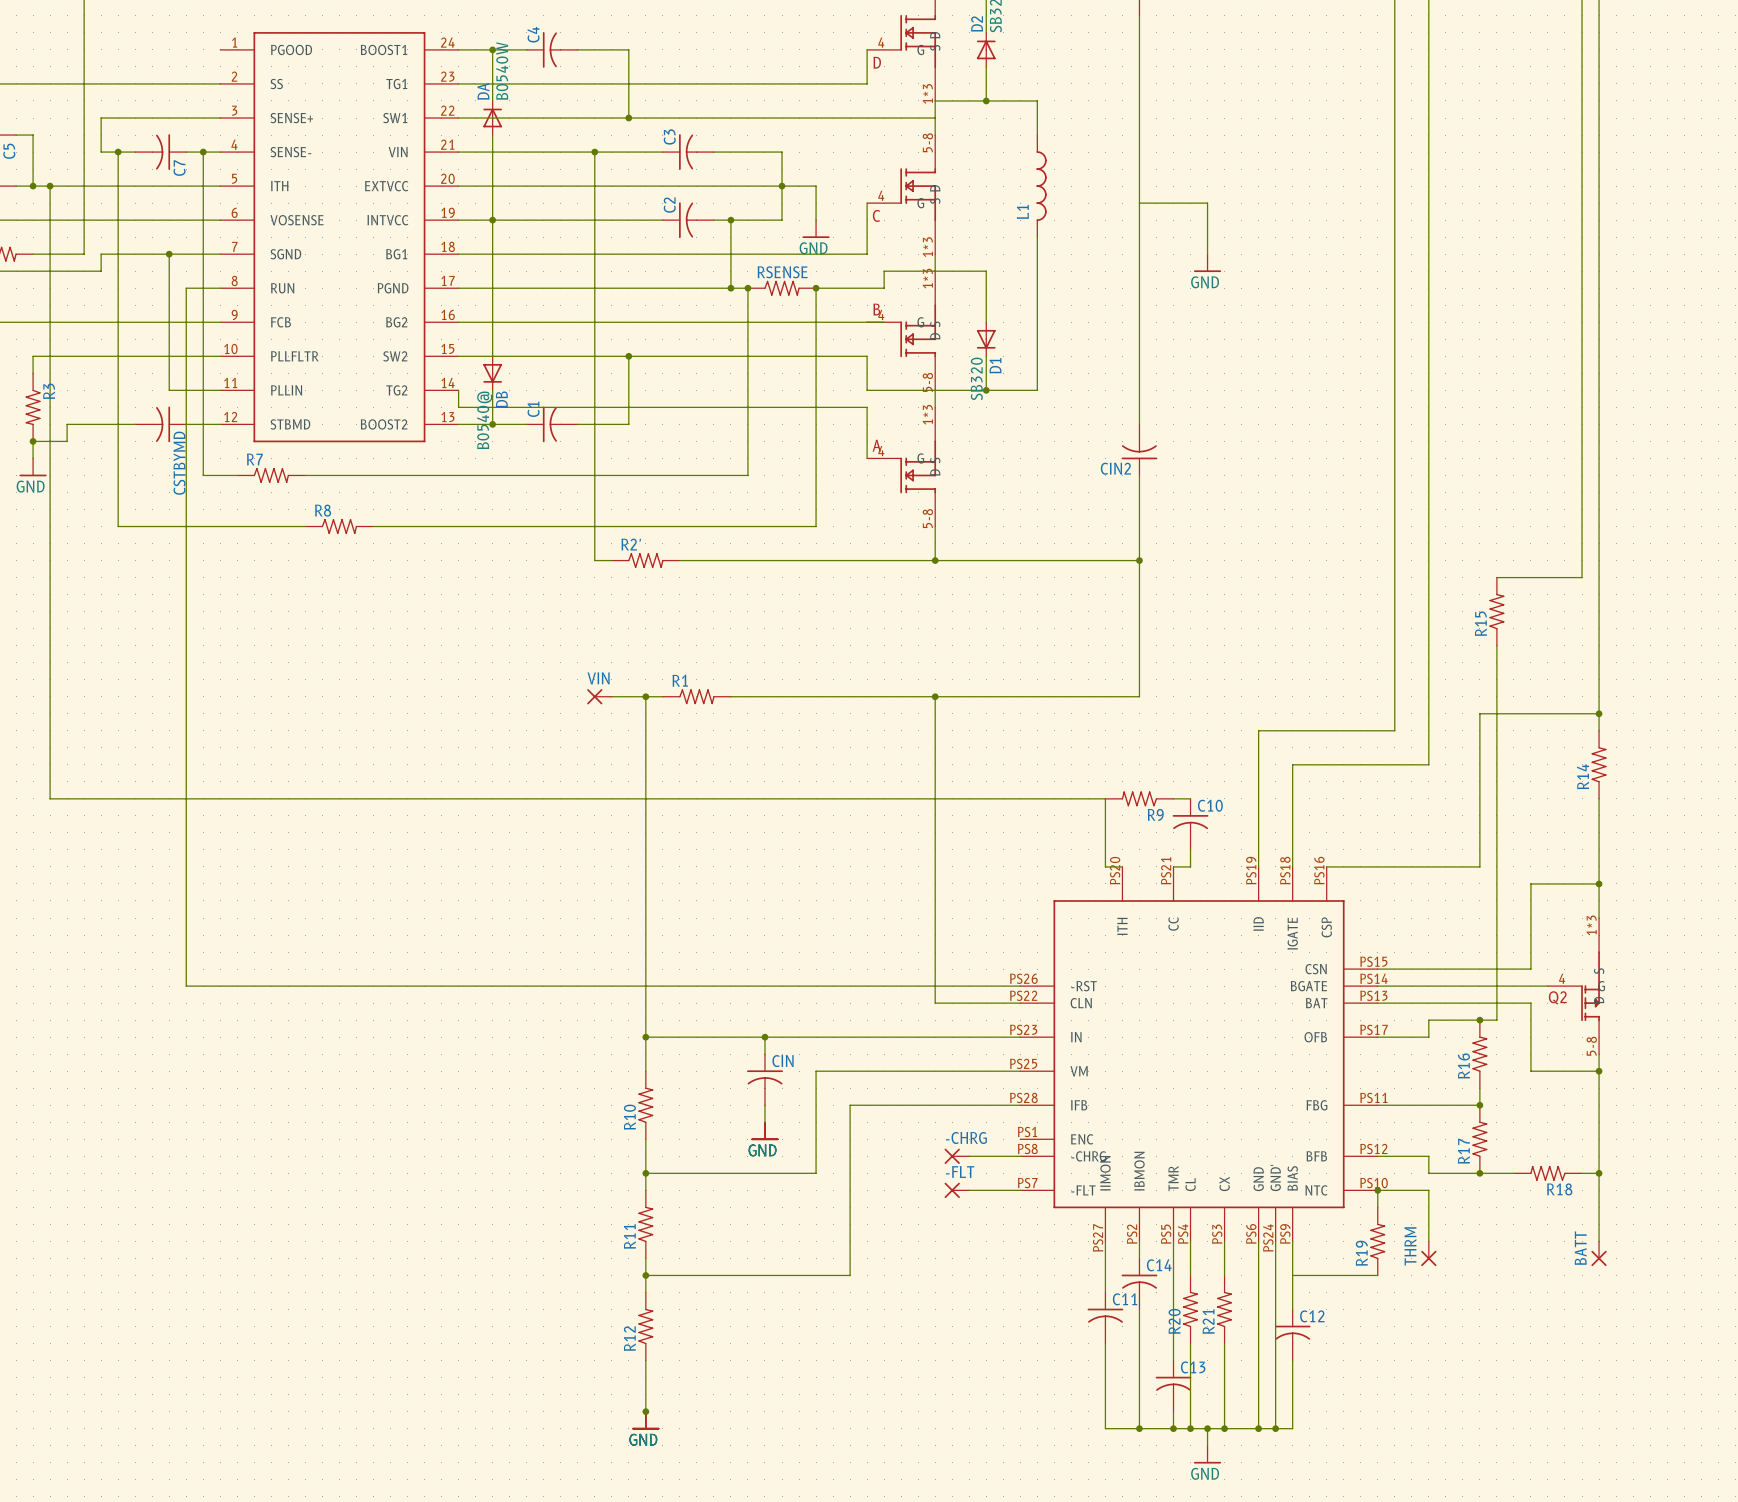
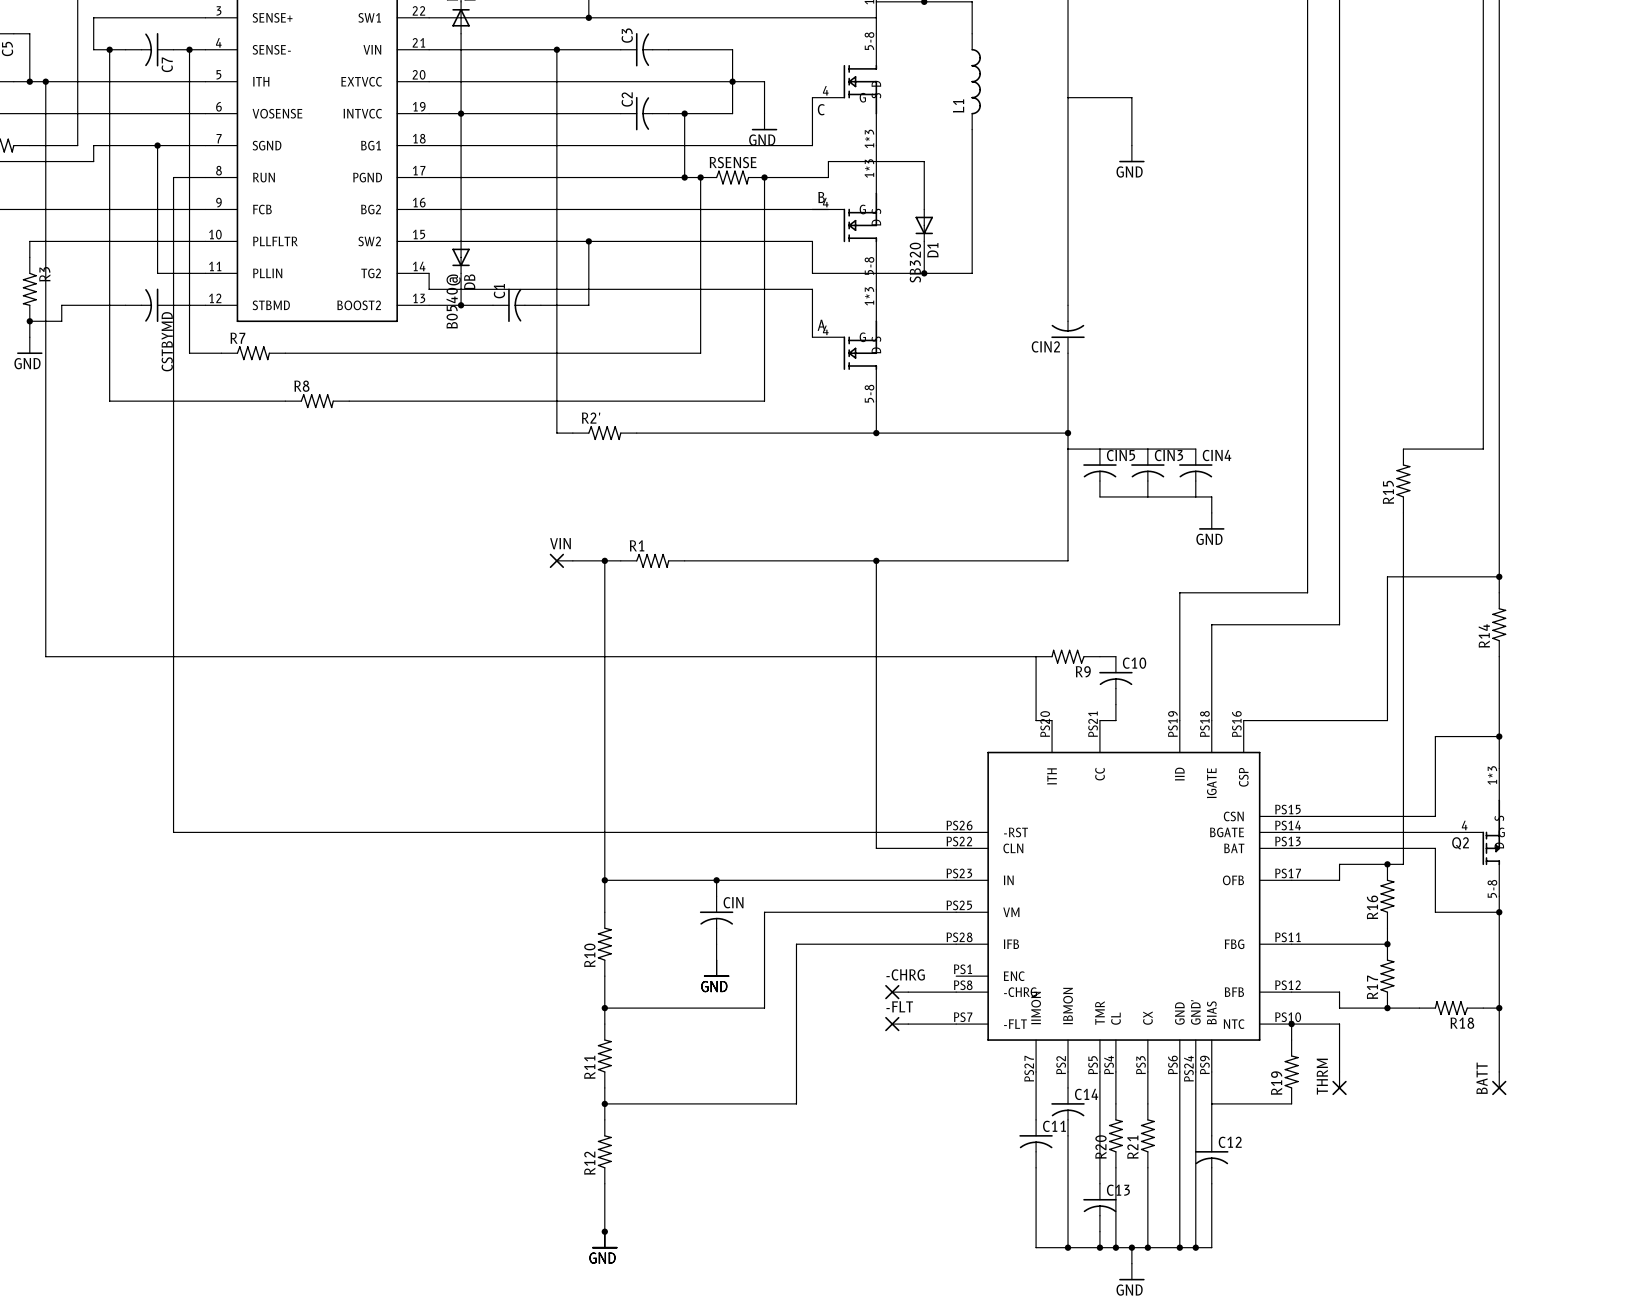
wire: none -> (1068, 449) (1195, 449)
CIN5: none -> (1099, 473)
CIN3: none -> (1147, 473)
CIN4: none -> (1195, 473)
wire: none -> (1099, 496) (1211, 496) (1211, 512)
power symbol: none -> GND (1211, 521)

